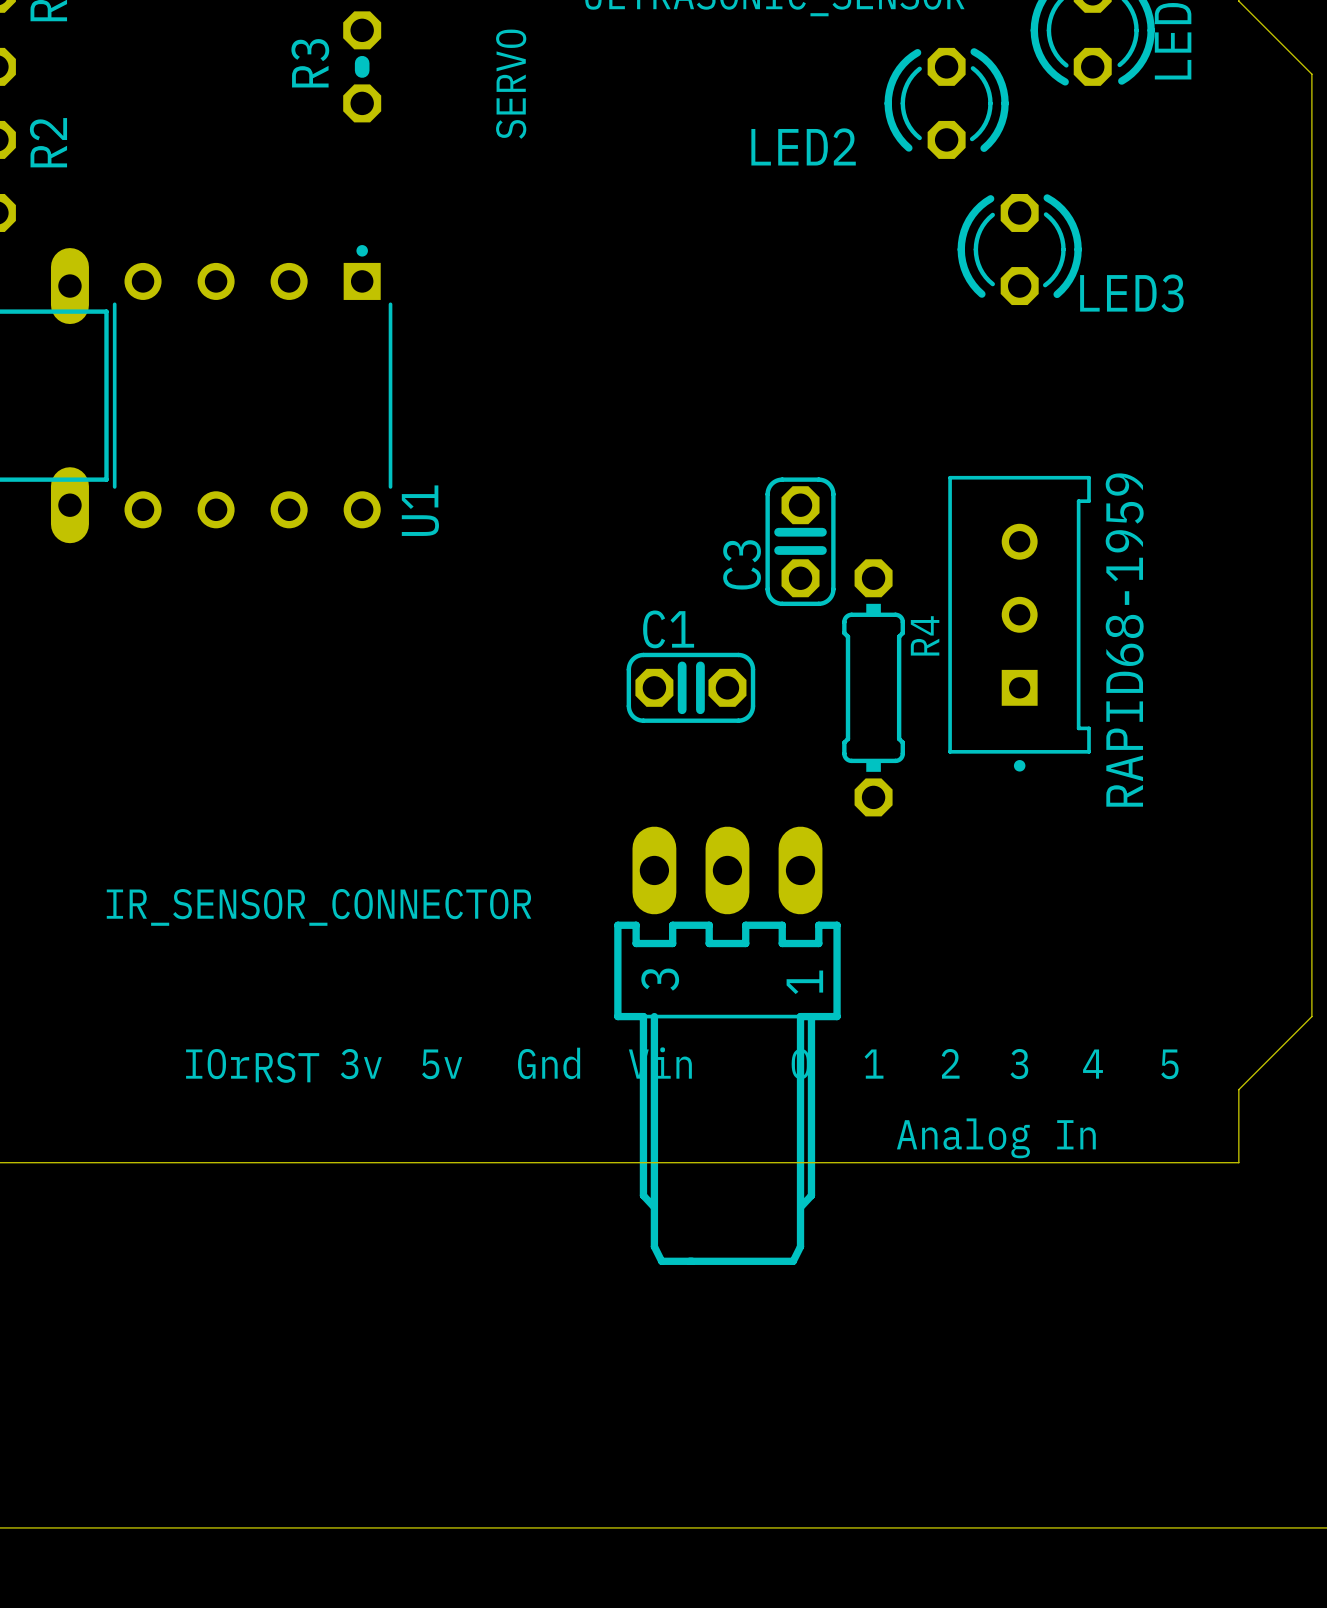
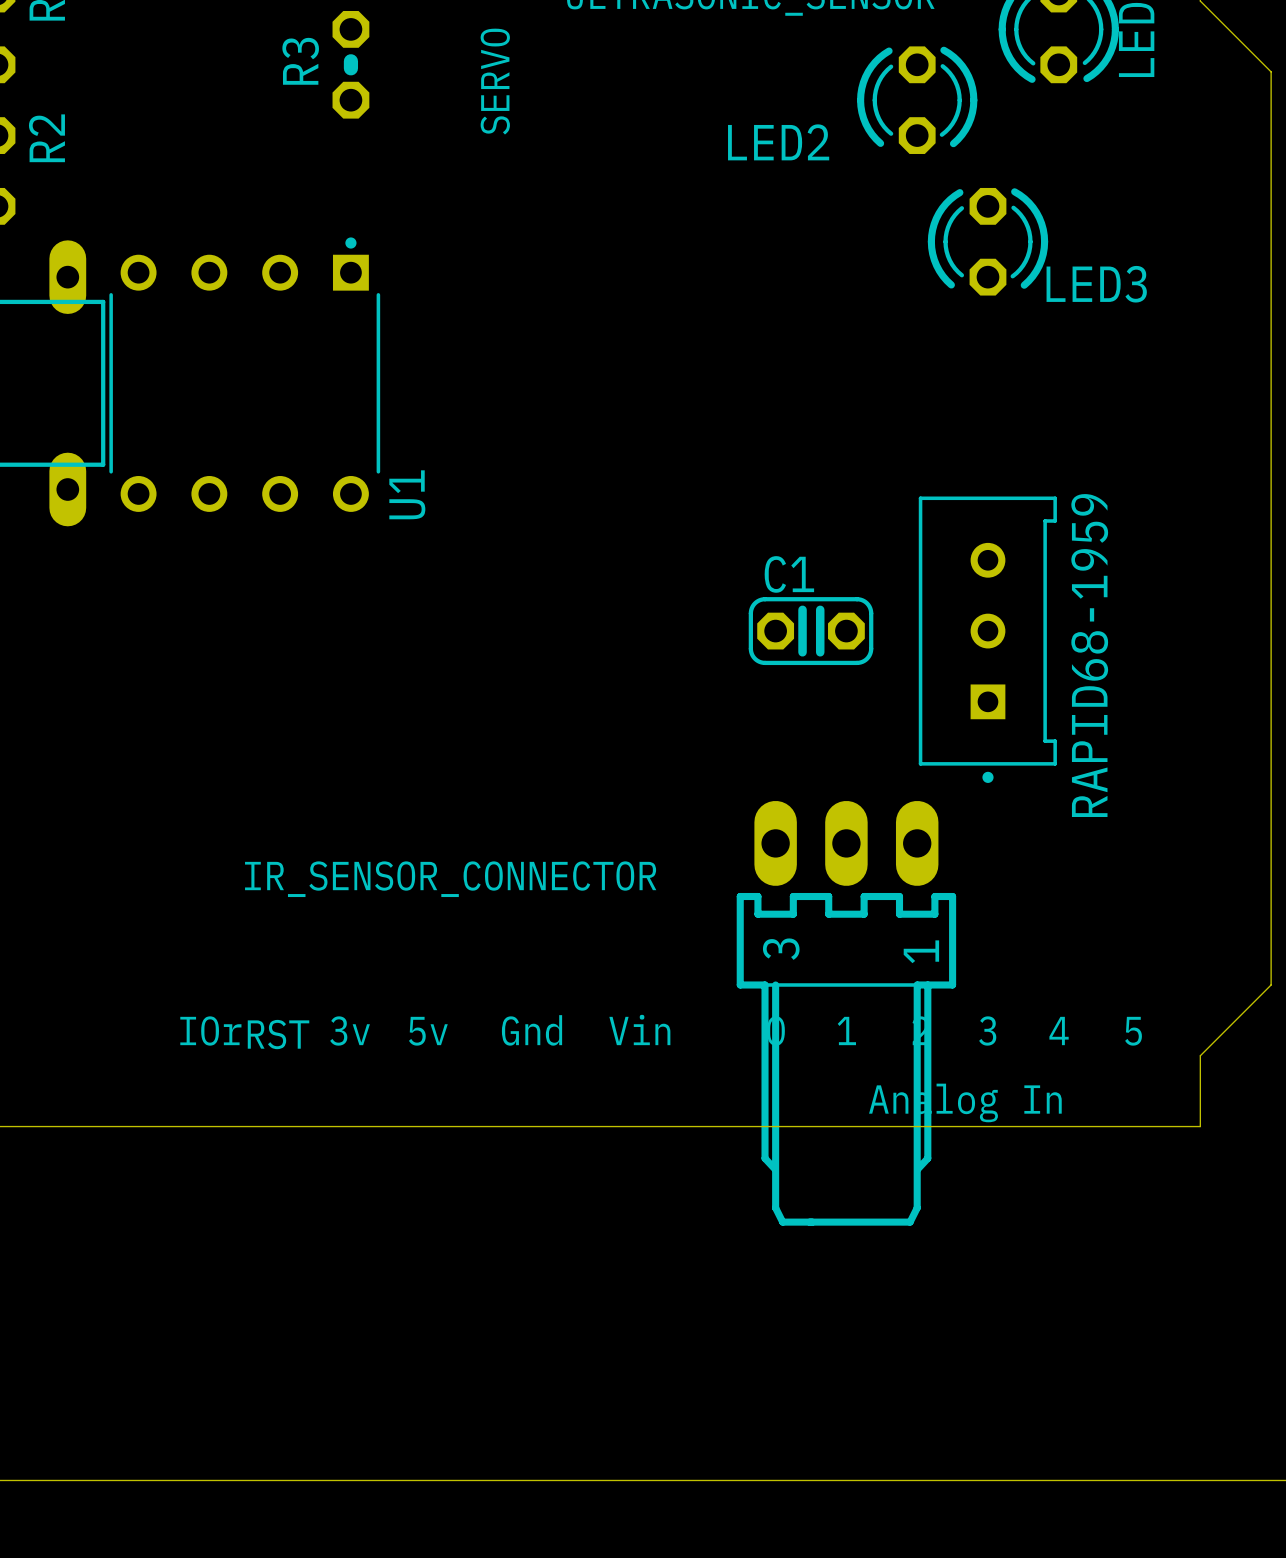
C3: (800, 541) -> none
RAPID68-1959 position: (1019, 623) -> (987, 639)
C1 position: (690, 687) -> (811, 631)
R4: (873, 687) -> none
IR_SENSOR_CONNECTOR position: (727, 1045) -> (846, 1013)

